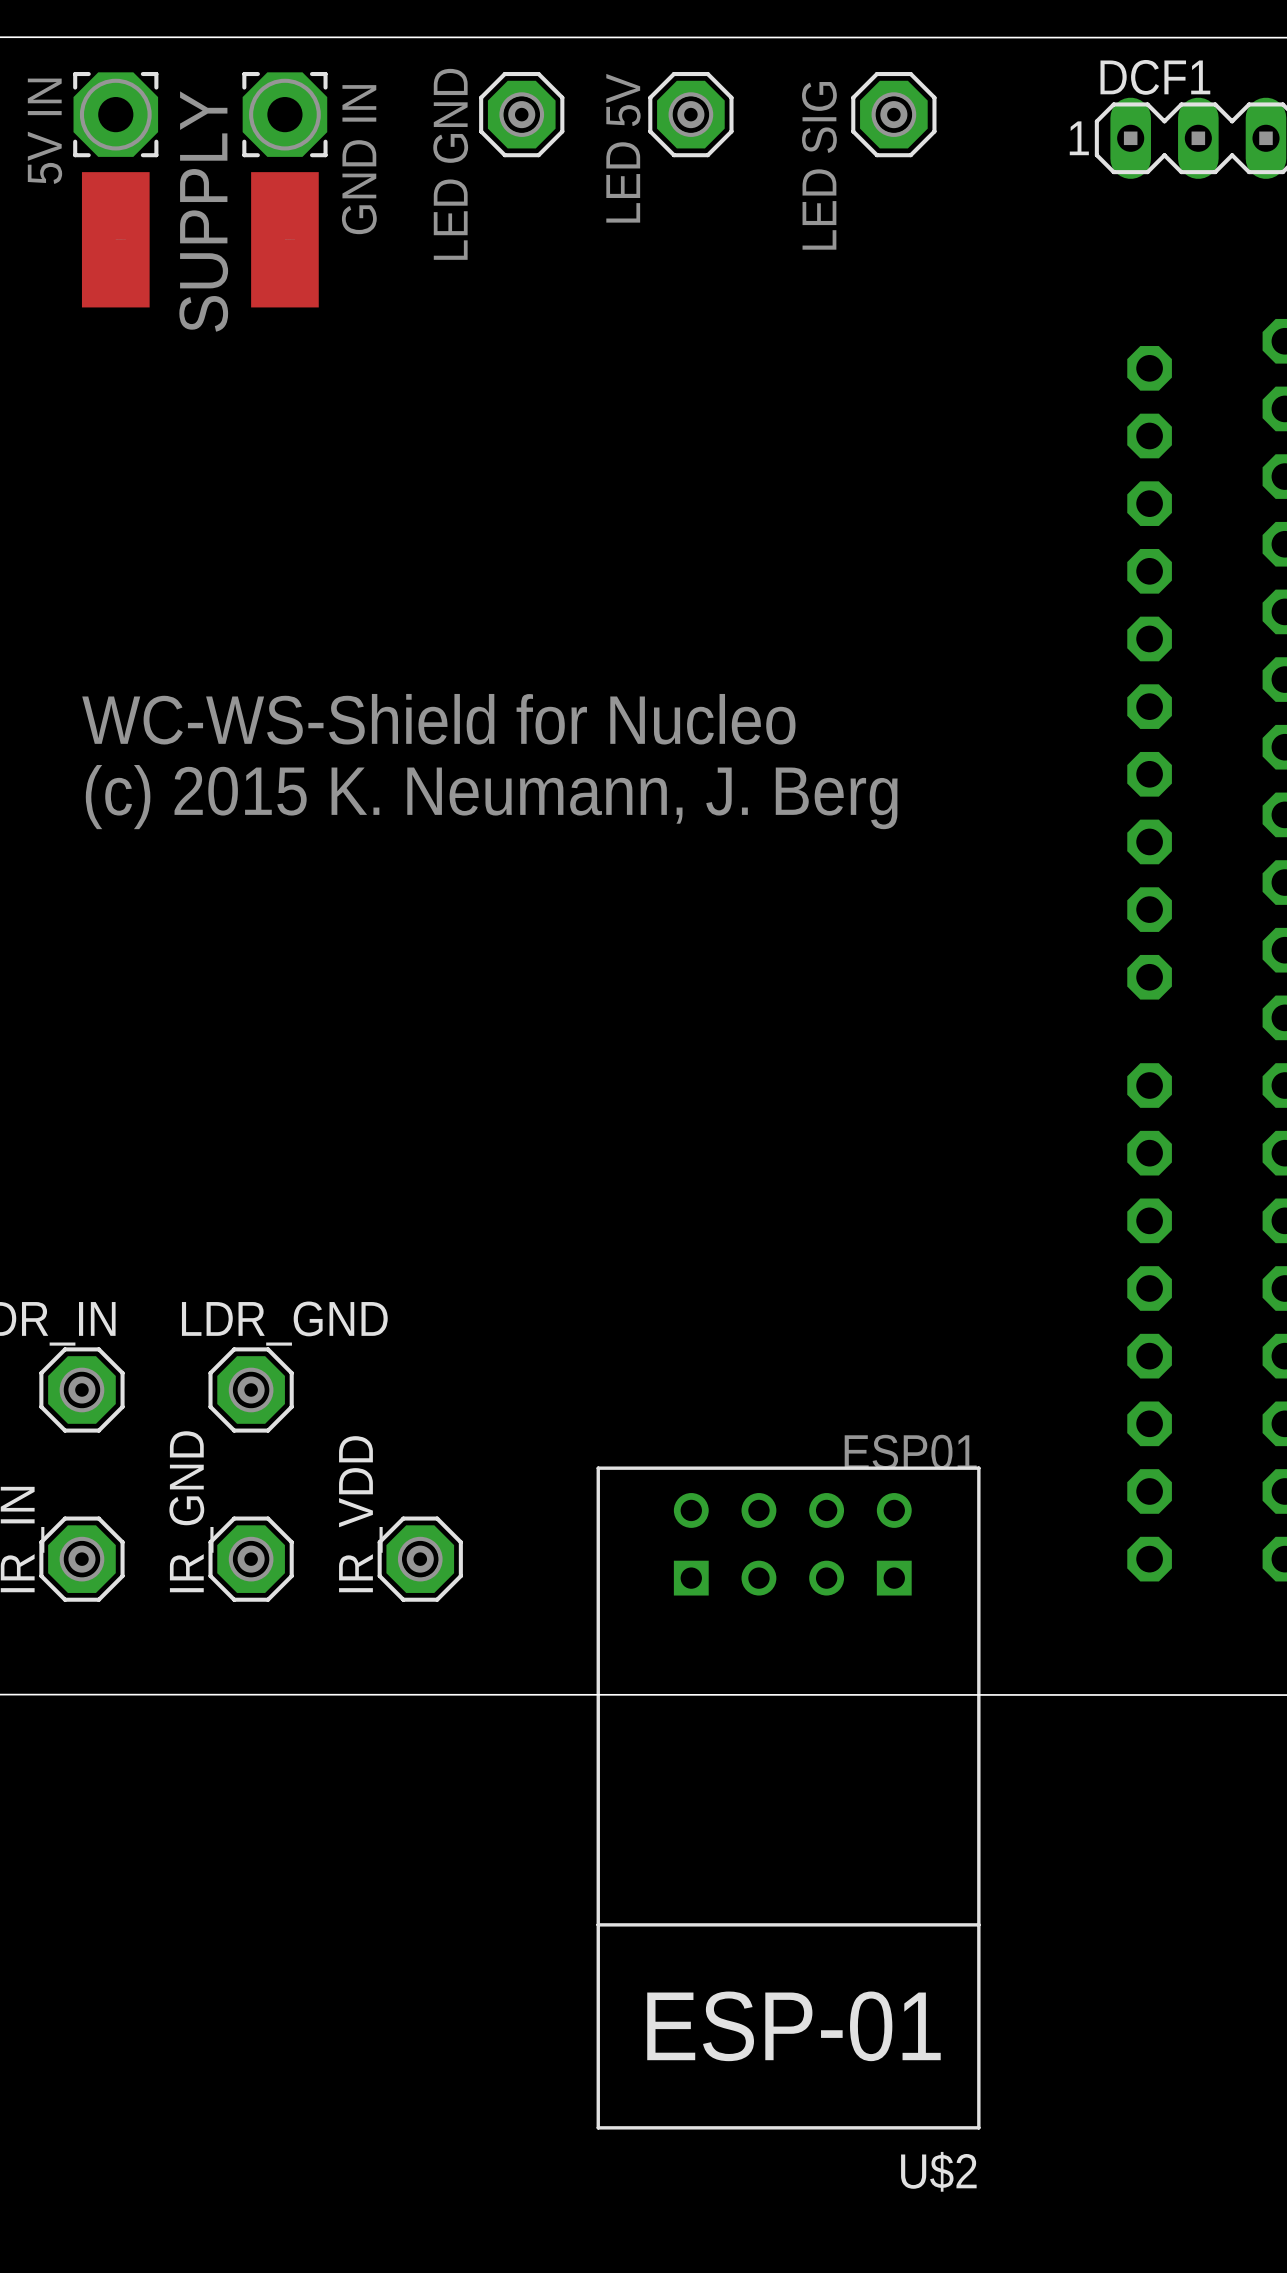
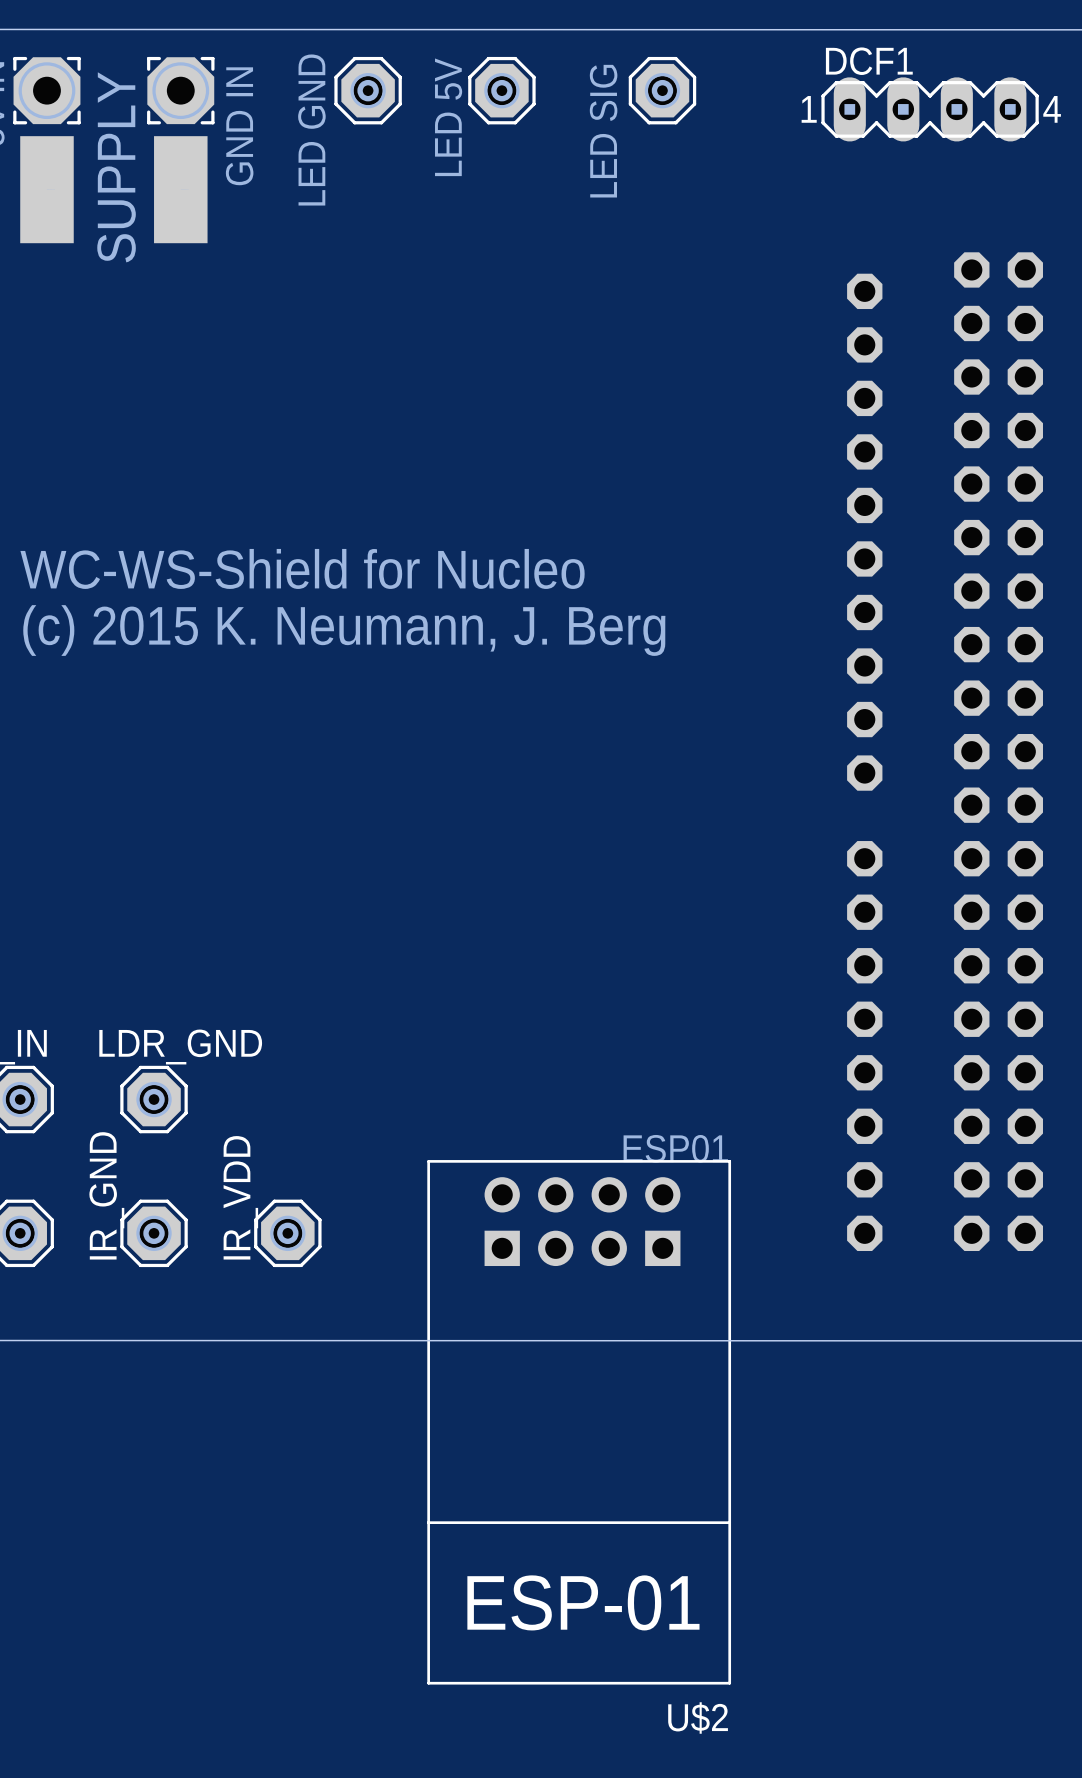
U$2 footprint: [596, 1466, 981, 2130] -> [427, 1160, 732, 1685]

